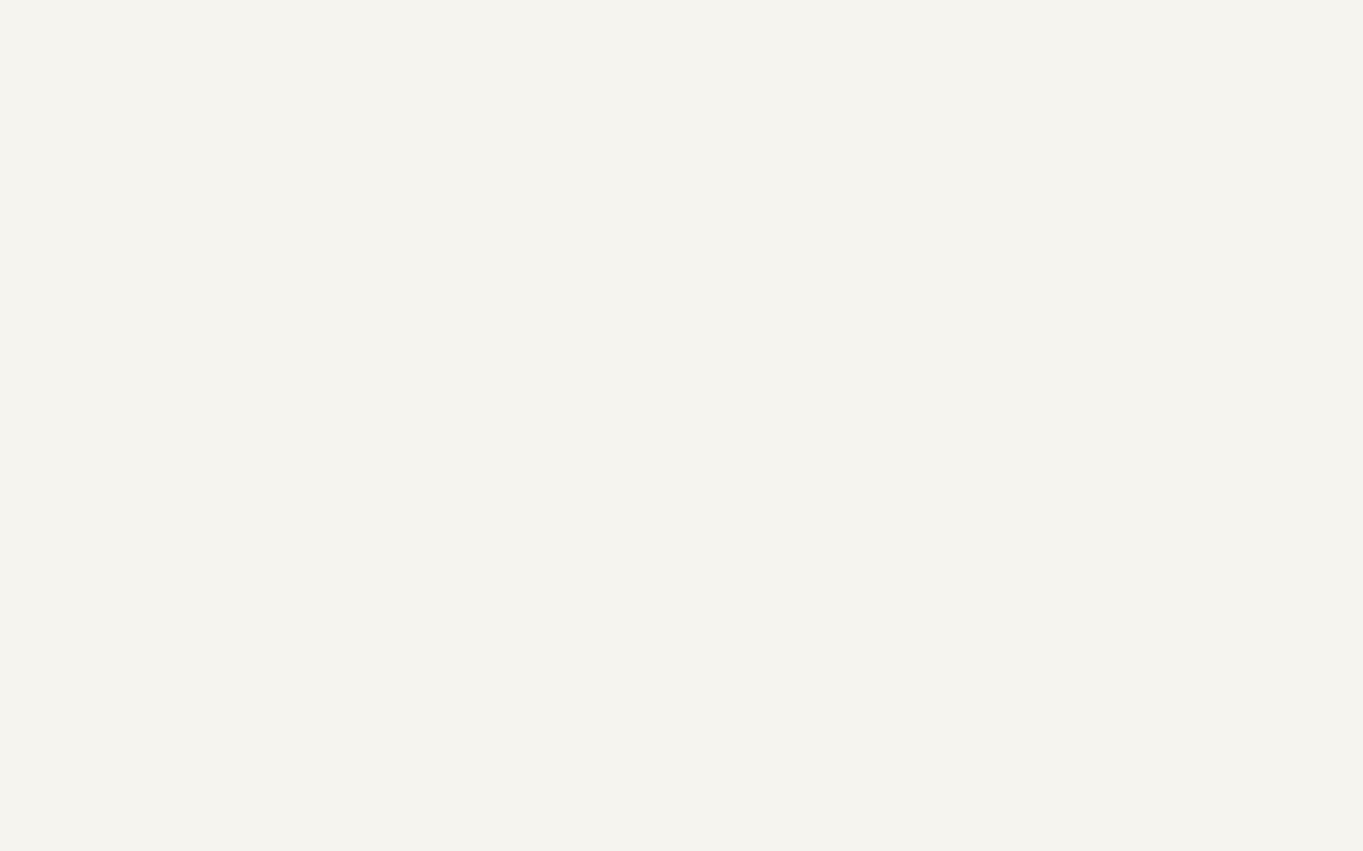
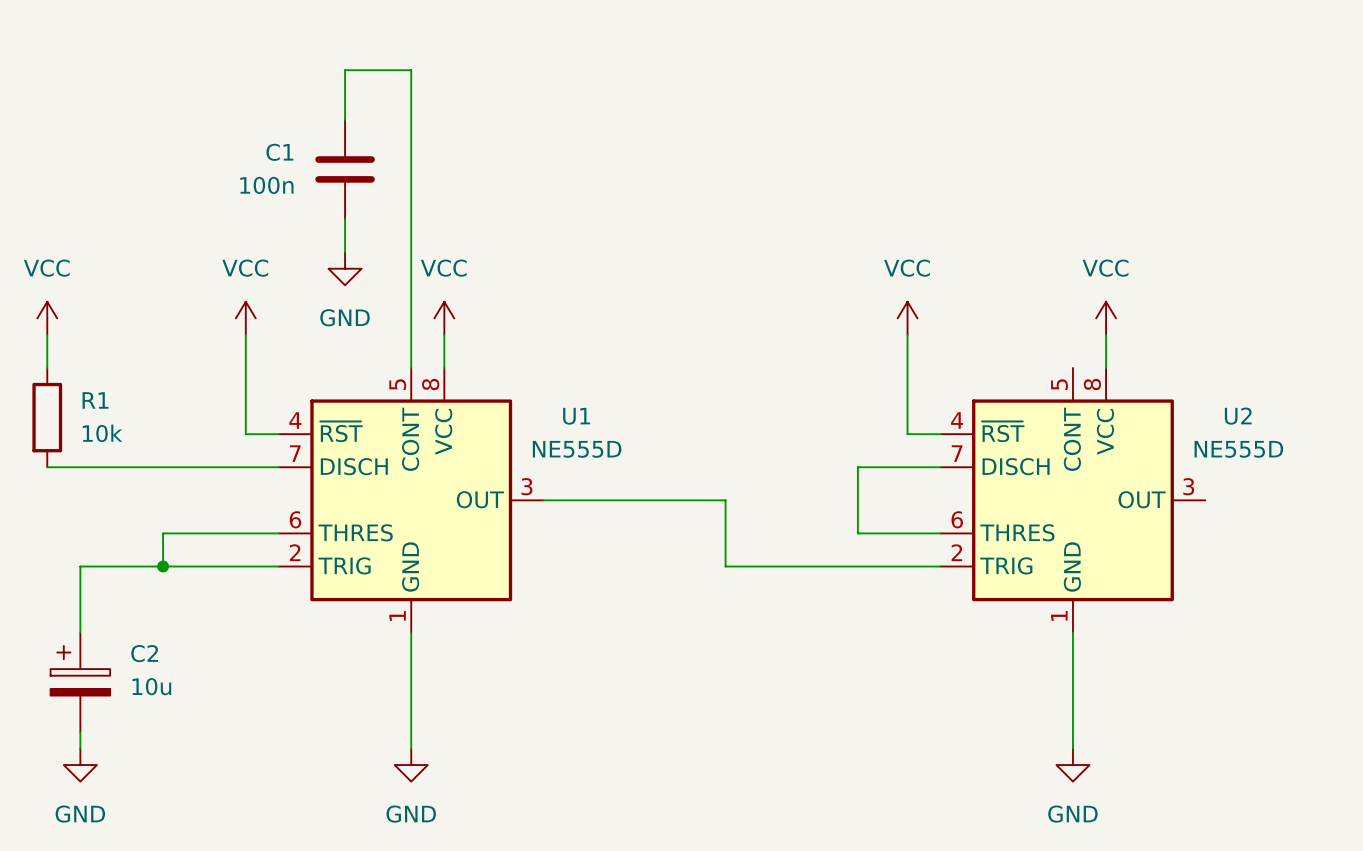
wire: none -> (345, 119) (345, 70) (411, 70) (411, 367)
C1: none -> 100n (345, 169)
wire: none -> (345, 219) (345, 252)
power symbol: none -> GND (345, 268)
power symbol: none -> VCC (47, 318)
power symbol: none -> VCC (245, 318)
power symbol: none -> VCC (444, 318)
power symbol: none -> VCC (907, 318)
power symbol: none -> VCC (1106, 318)
wire: none -> (47, 334) (47, 367)
wire: none -> (245, 334) (245, 434) (278, 434)
wire: none -> (444, 334) (444, 367)
wire: none -> (907, 334) (907, 434) (940, 434)
wire: none -> (1106, 334) (1106, 367)
R1: none -> 10k (47, 417)
wire: none -> (47, 467) (278, 467)
wire: none -> (940, 467) (857, 467) (857, 533) (940, 533)
U1: none -> NE555D (411, 500)
wire: none -> (543, 500) (725, 500) (725, 566) (940, 566)
U2: none -> NE555D (1072, 500)
wire: none -> (278, 533) (163, 533) (163, 566)
junction: none -> (163, 566)
wire: none -> (278, 566) (80, 566) (80, 632)
wire: none -> (411, 632) (411, 748)
wire: none -> (1072, 632) (1072, 748)
C2: none -> 10u (80, 682)
wire: none -> (80, 731) (80, 748)
power symbol: none -> GND (80, 765)
power symbol: none -> GND (411, 765)
power symbol: none -> GND (1072, 765)

